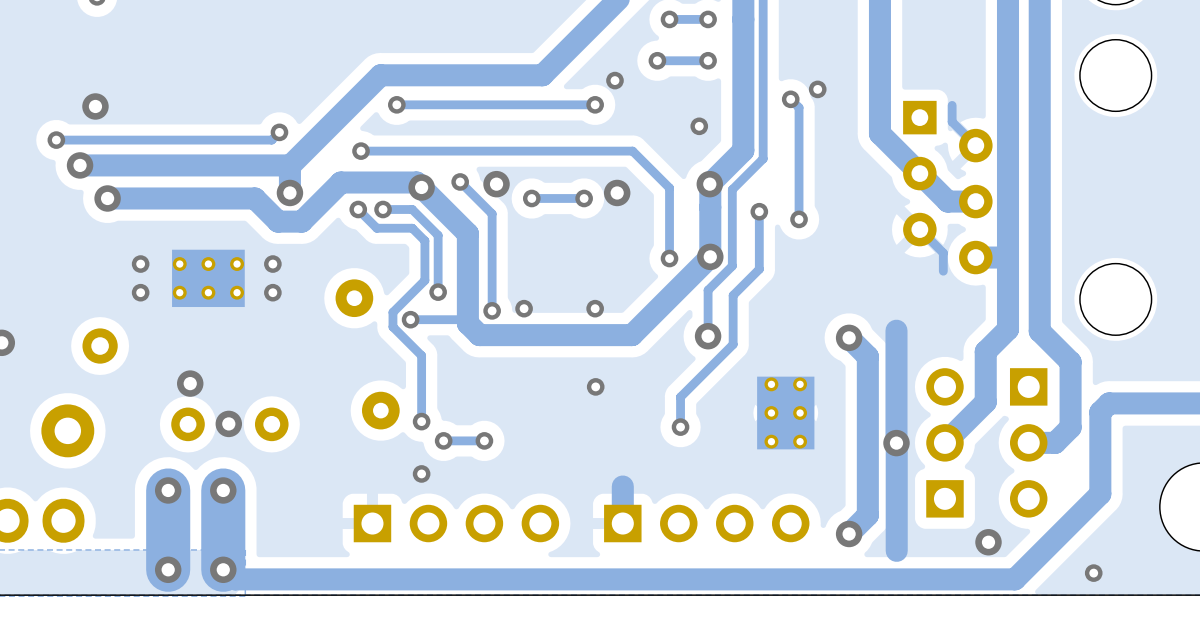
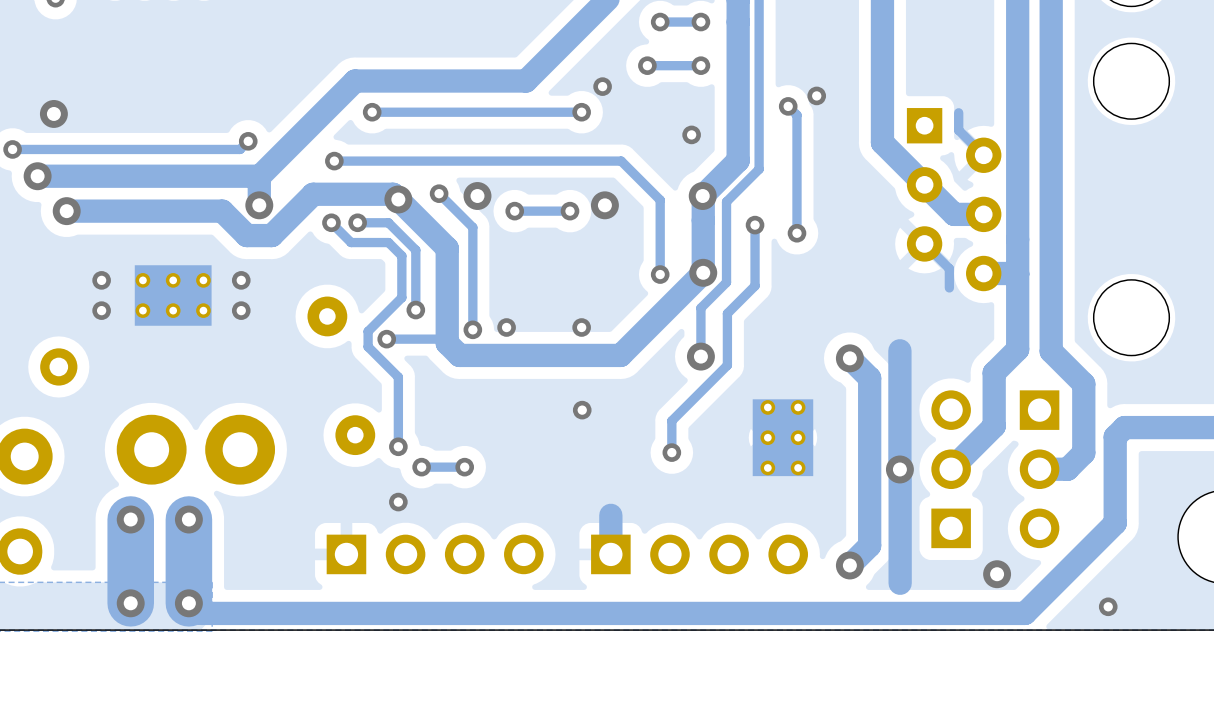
via: (190, 383) -> none
part footprint: [171, 407, 289, 442] -> [116, 414, 276, 485]
via: (228, 423) -> none

